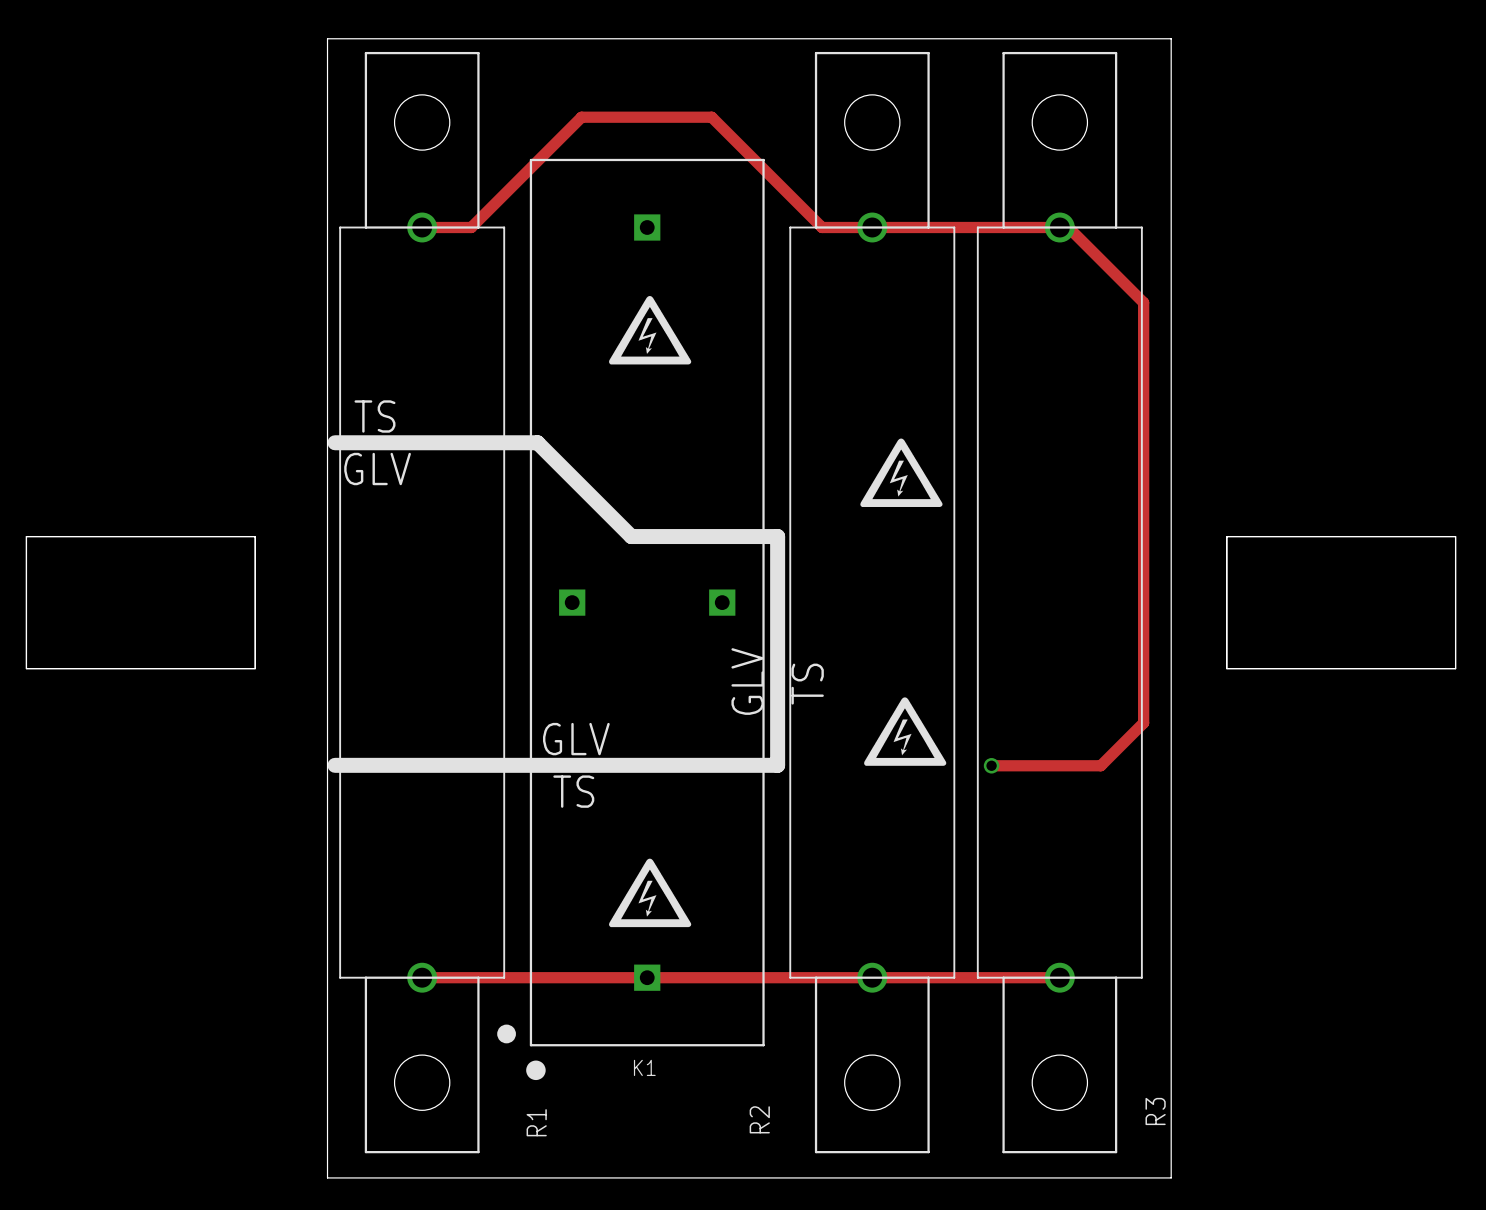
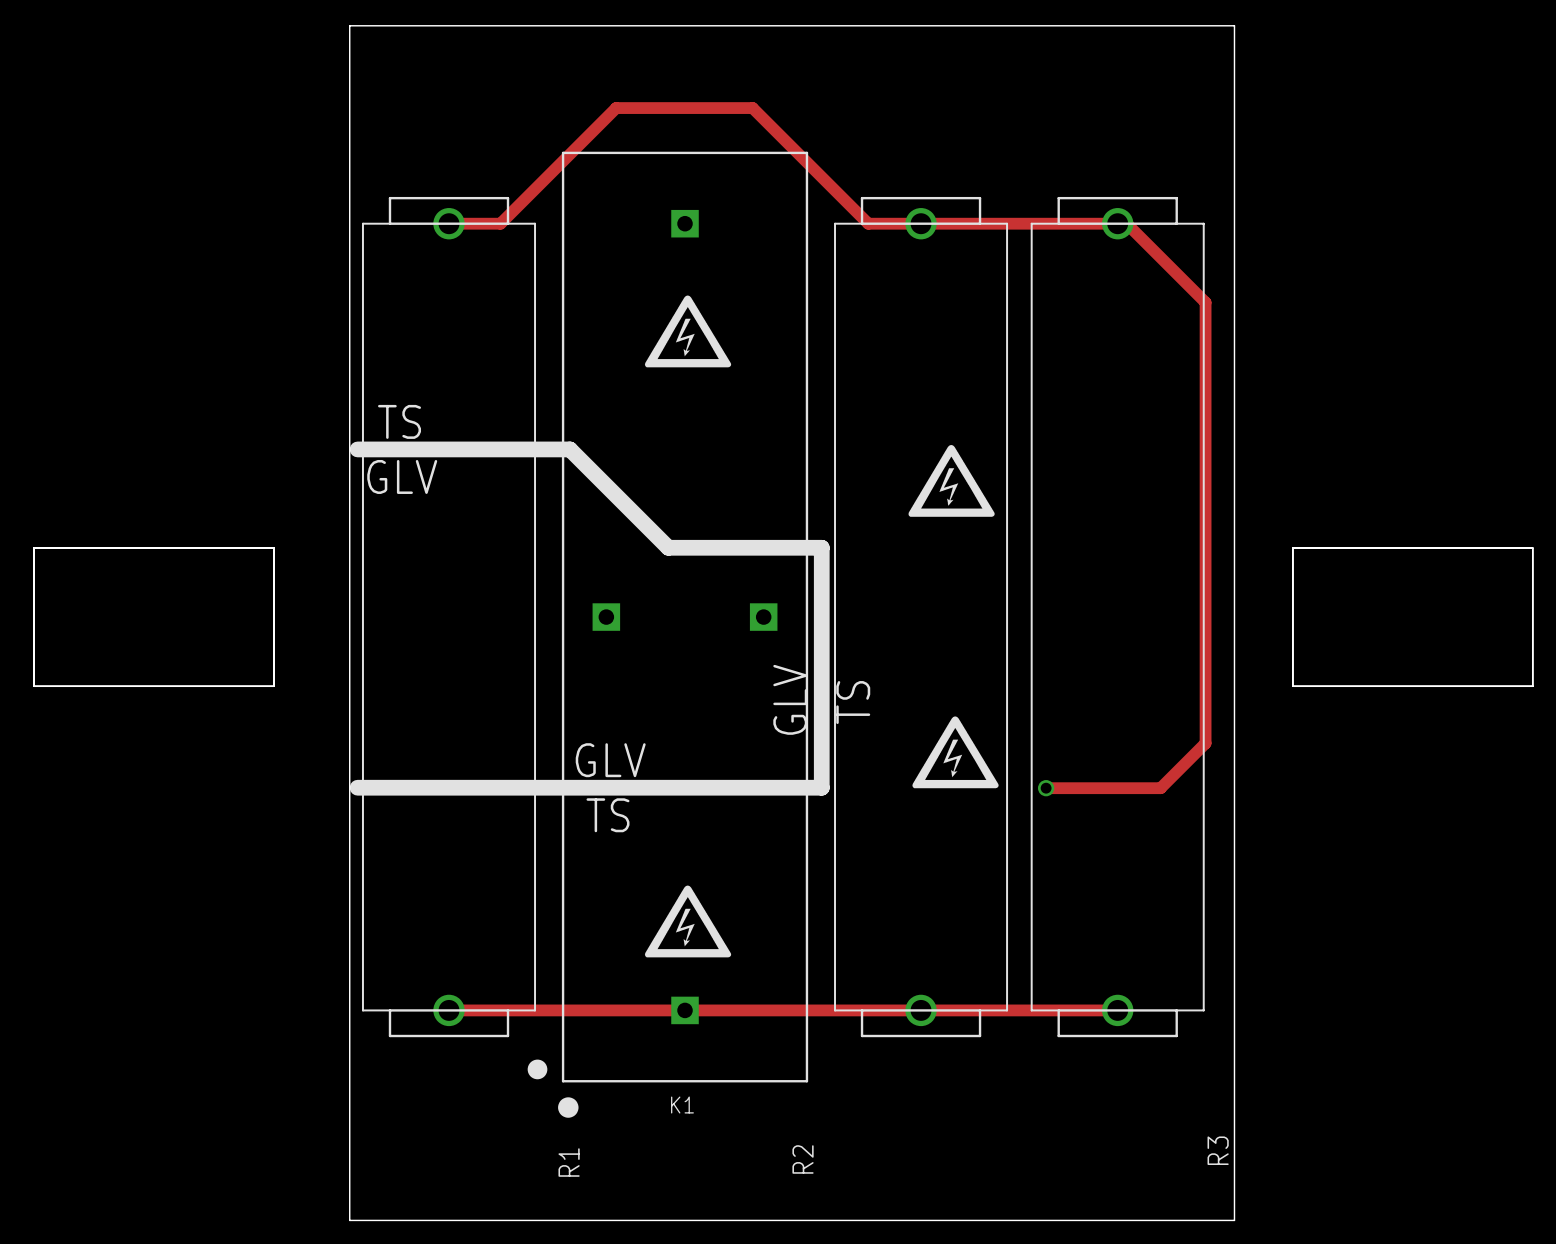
R1 footprint: [339, 51, 506, 1154] -> [361, 196, 537, 1038]
R2 footprint: [789, 51, 956, 1154] -> [834, 196, 1009, 1038]
R3 footprint: [976, 51, 1143, 1154] -> [1030, 196, 1205, 1038]

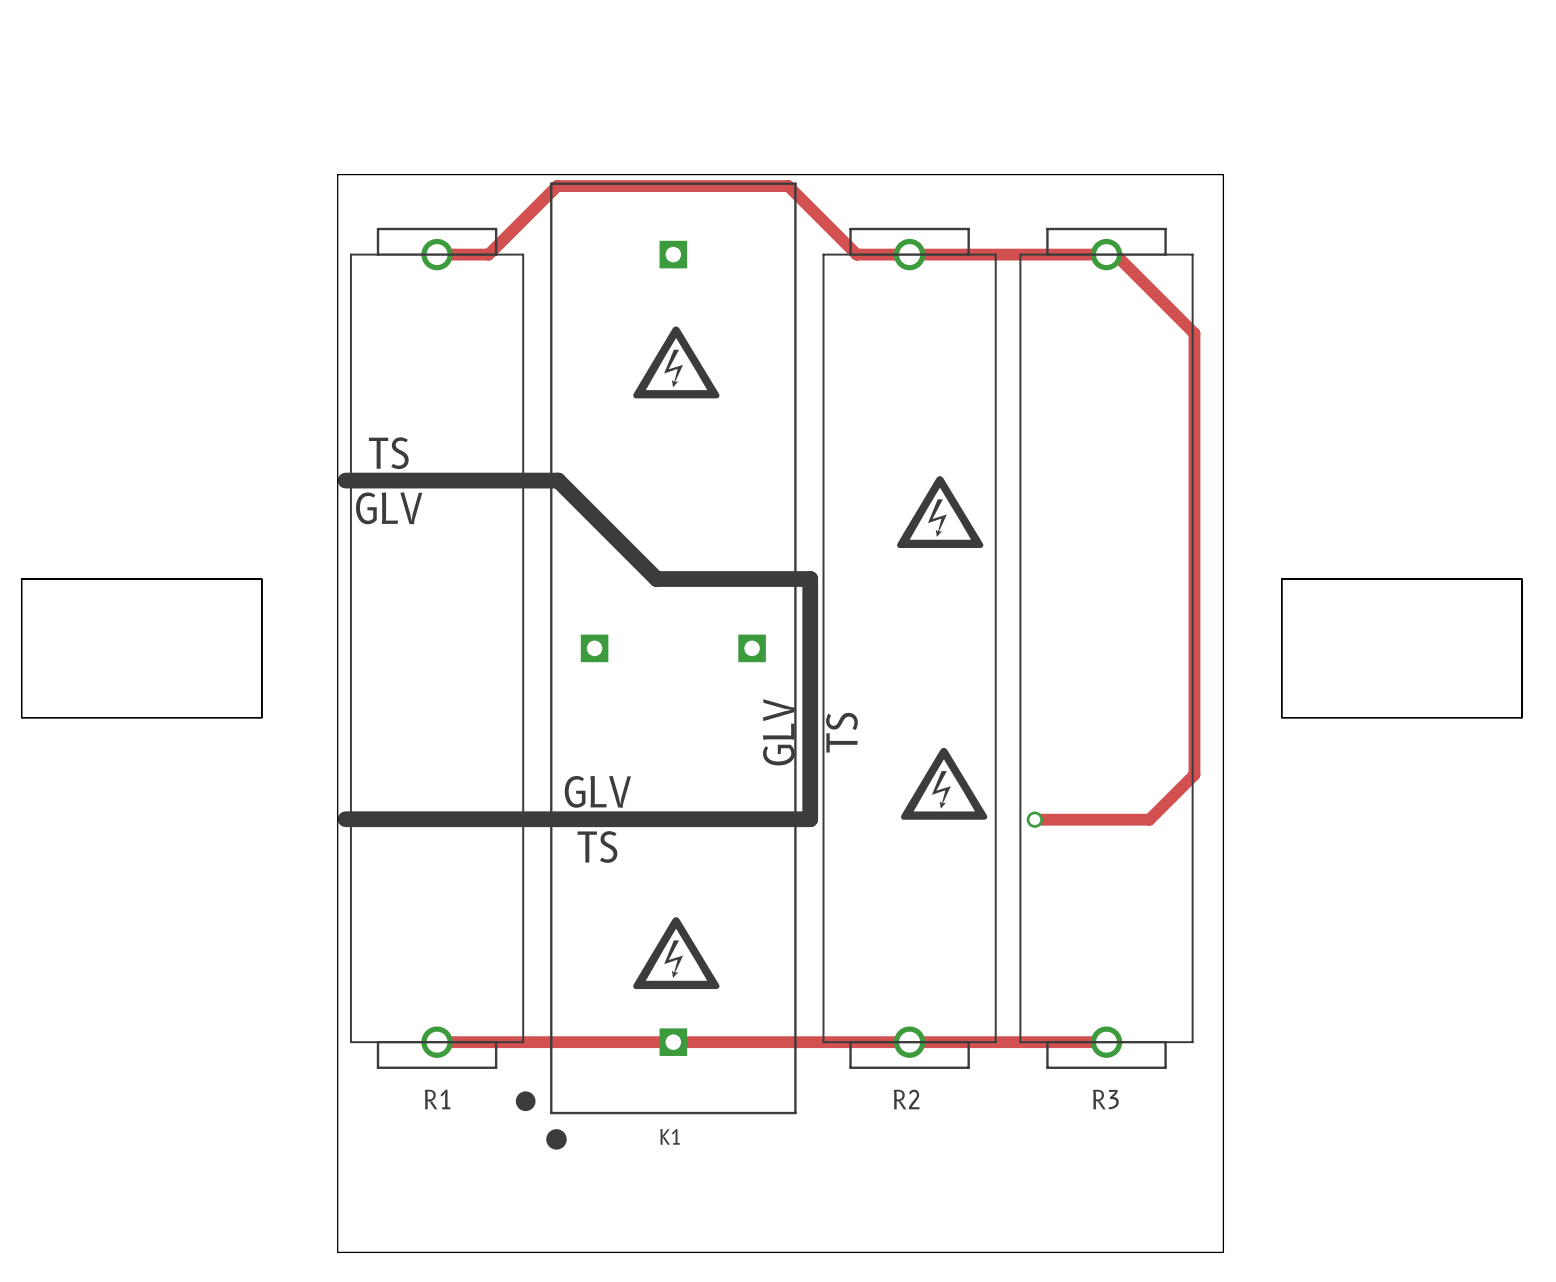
board edge: (349, 143) (349, 25) (1234, 25) (1234, 143) -> (337, 174) (1223, 174)
track: (568, 155) (616, 108) (752, 108) (799, 155) -> (557, 186) (788, 186)
R3 name rotation: 0° (1218, 1150) -> 90° clockwise (1105, 1099)
R3 name position: R3 (1218, 1150) -> R3 (1105, 1099)
R2 name rotation: 0° (803, 1159) -> 90° clockwise (906, 1099)
R2 name position: R2 (803, 1159) -> R2 (906, 1099)
R1 name rotation: 0° (569, 1162) -> 90° clockwise (437, 1099)
R1 name position: R1 (569, 1162) -> R1 (437, 1099)

